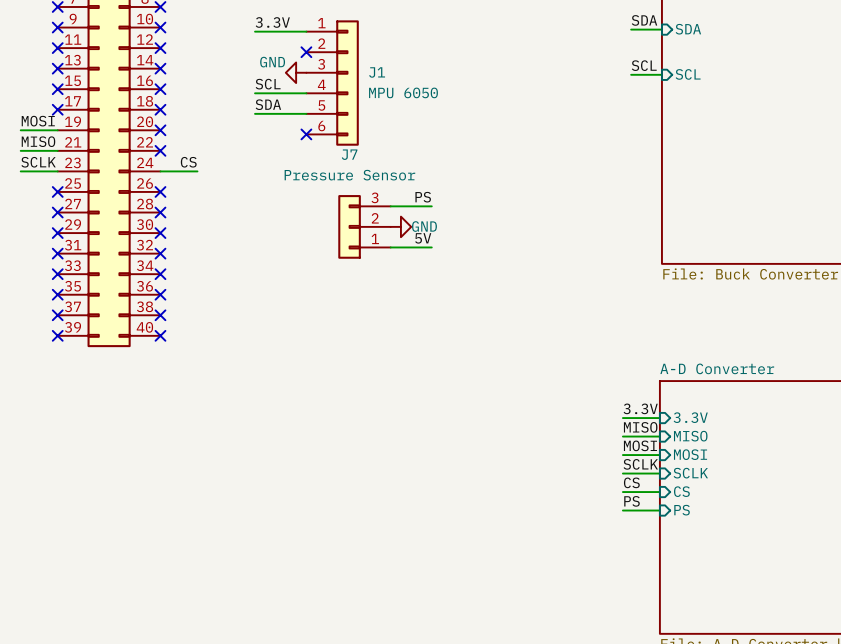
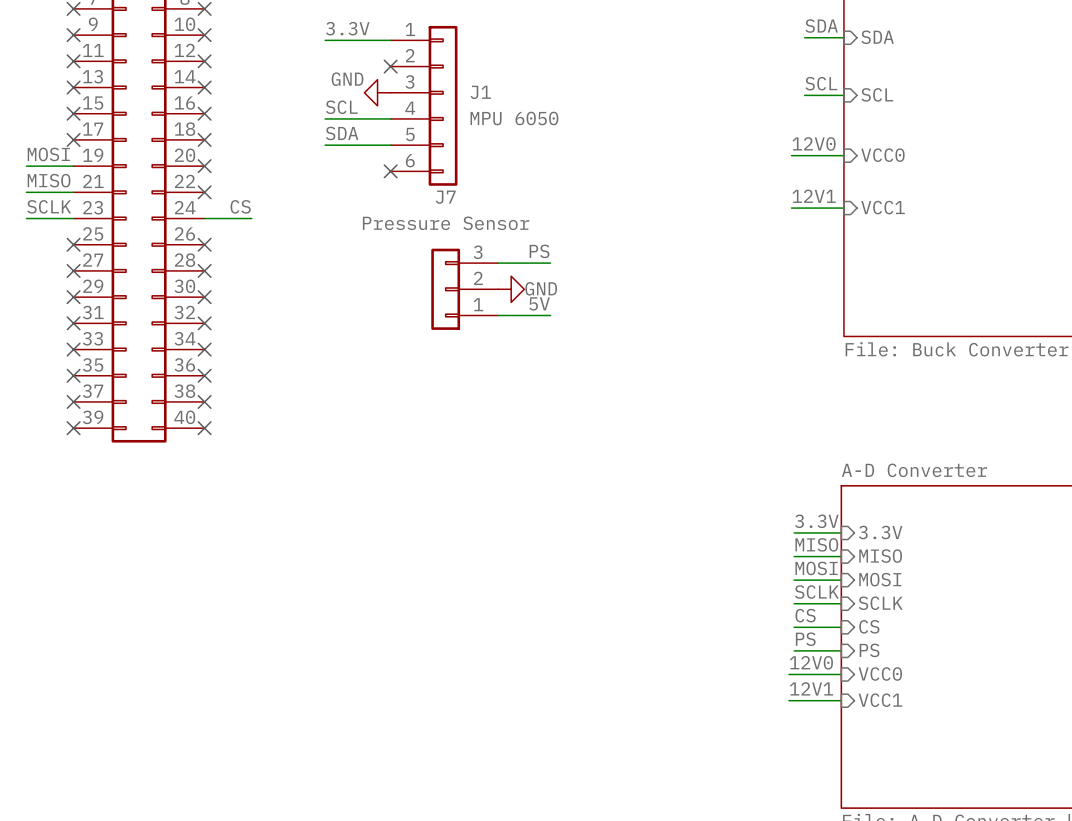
label: none -> 12V0 (814, 143)
sheet pin: none -> VCC0 (882, 155)
wire: none -> (791, 155) (843, 155)
label: none -> 12V1 (814, 196)
sheet pin: none -> VCC1 (883, 207)
wire: none -> (791, 208) (843, 208)
label: none -> 12V0 (811, 662)
sheet pin: none -> VCC0 (880, 673)
wire: none -> (788, 674) (841, 674)
label: none -> 12V1 (811, 688)
wire: none -> (788, 700) (841, 700)
sheet pin: none -> VCC1 (880, 700)

